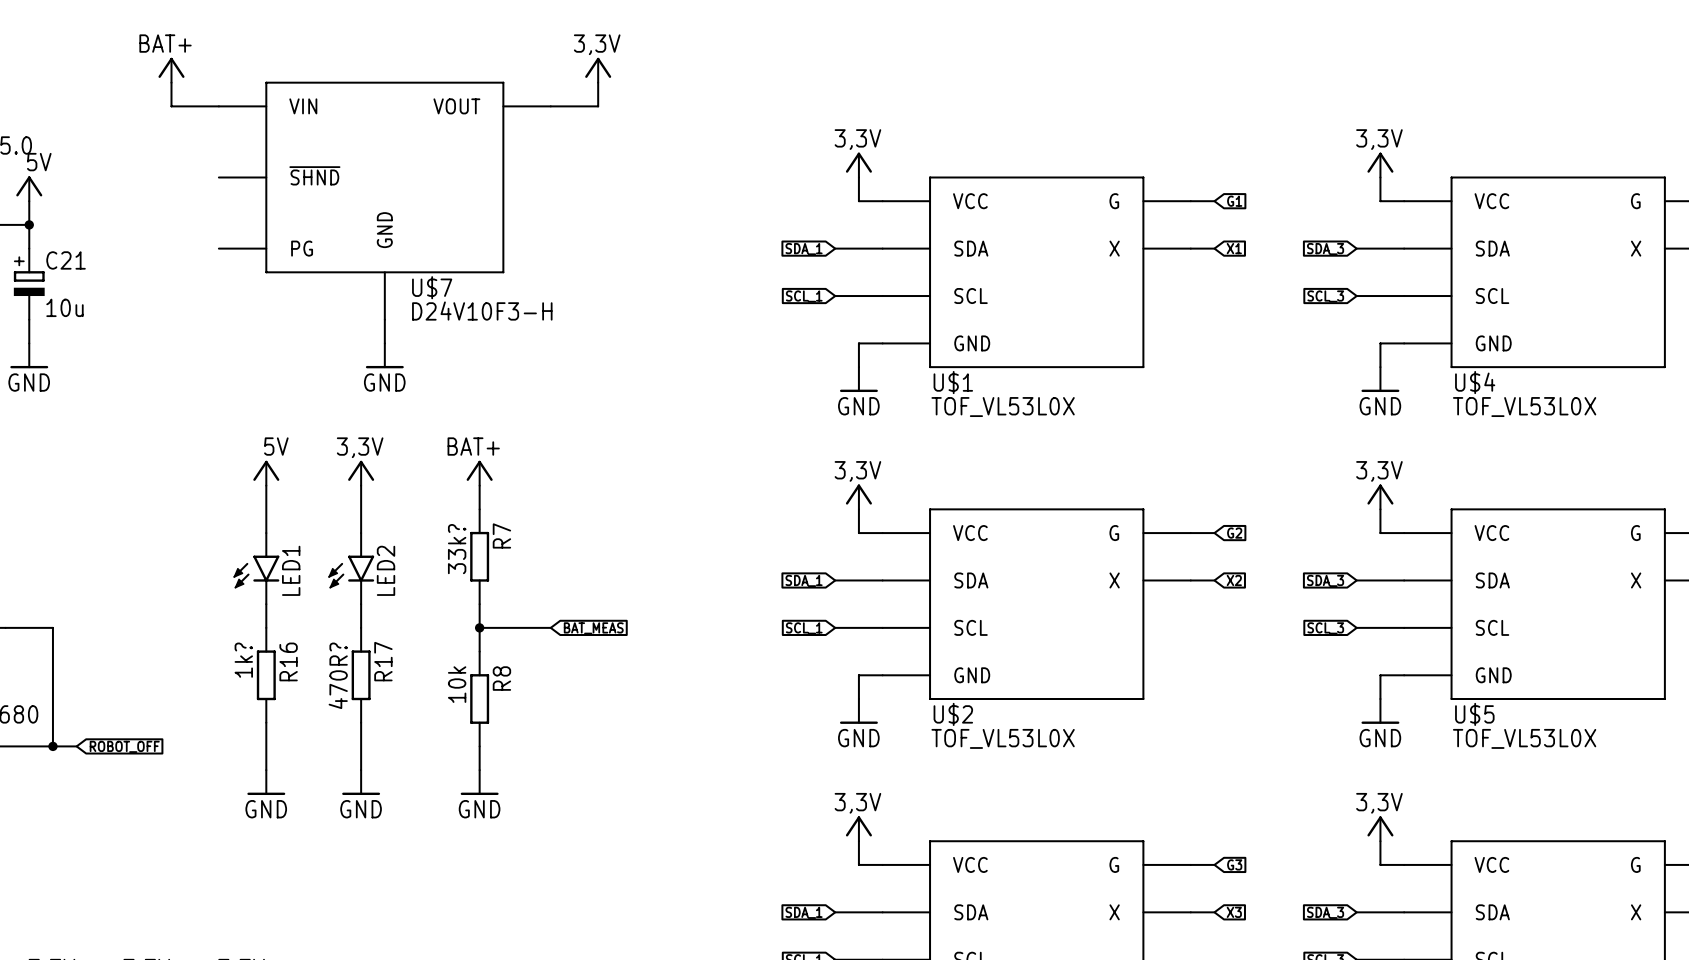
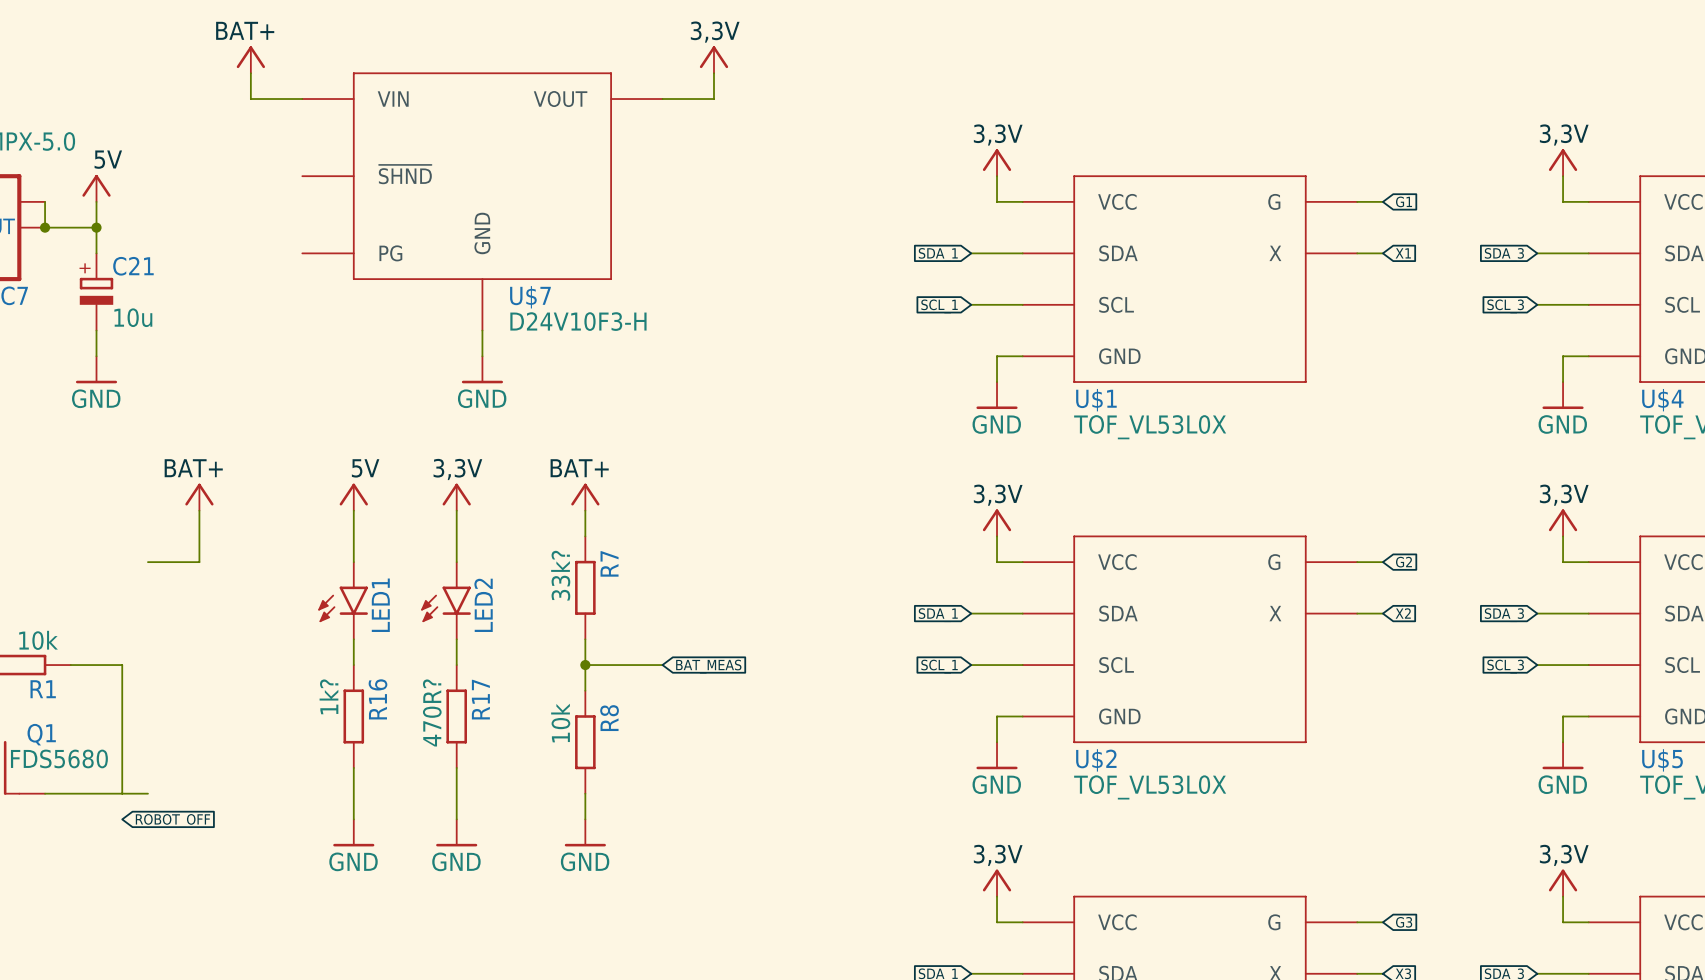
label: none -> BAT+ (193, 468)
power symbol: none -> (199, 497)
wire: none -> (199, 510) (199, 562) (147, 562)
junction: (52, 746) -> none
global label position: ROBOT_OFF (124, 746) -> ROBOT_OFF (172, 820)

